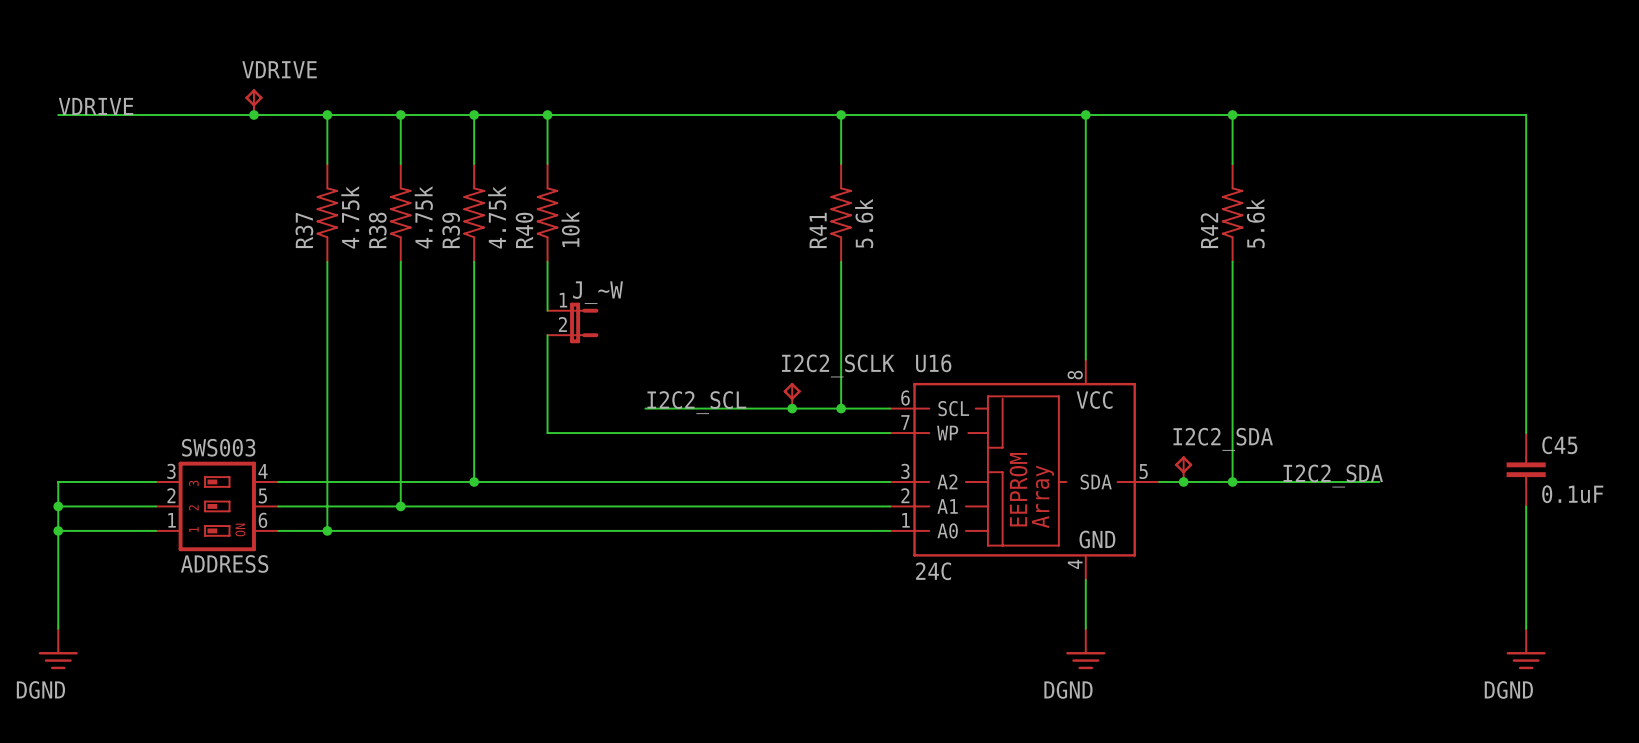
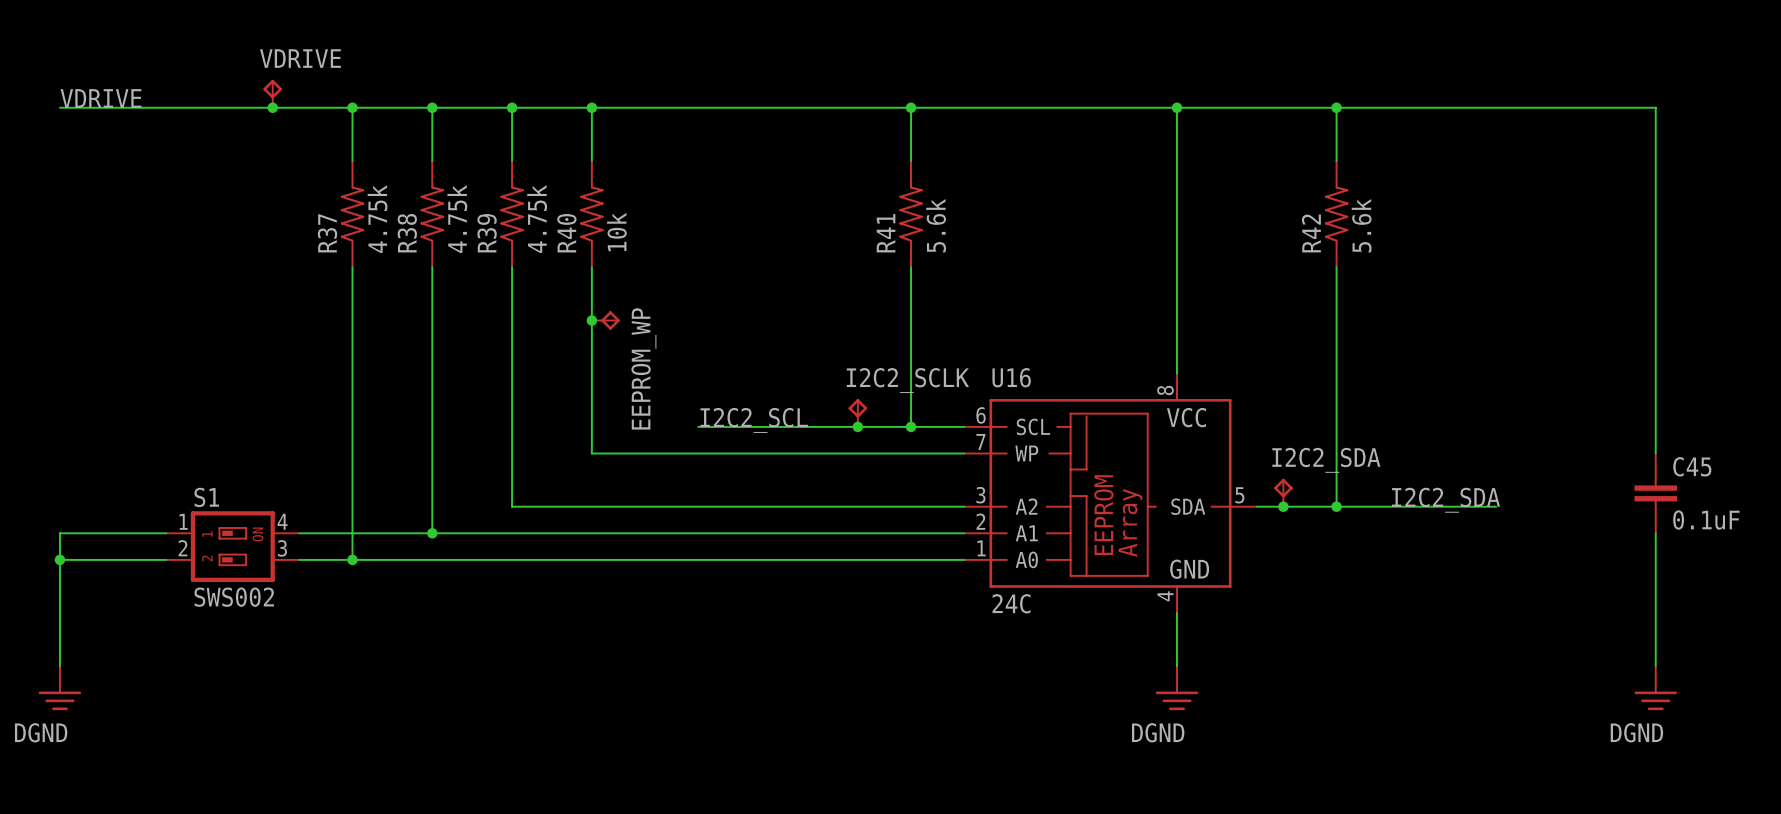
wire: none -> (591, 320) (591, 347)
junction: none -> (591, 320)
EEPROM_WP: none -> (605, 320)
J_~W: (572, 322) -> none
wire: (156, 481) (58, 481) (58, 506) -> none
wire: (278, 481) (474, 481) -> none
junction: (474, 481) -> none
junction: (58, 506) -> none
ADDRESS: SWS003 (217, 506) -> none
S1: none -> SWS002 (232, 546)

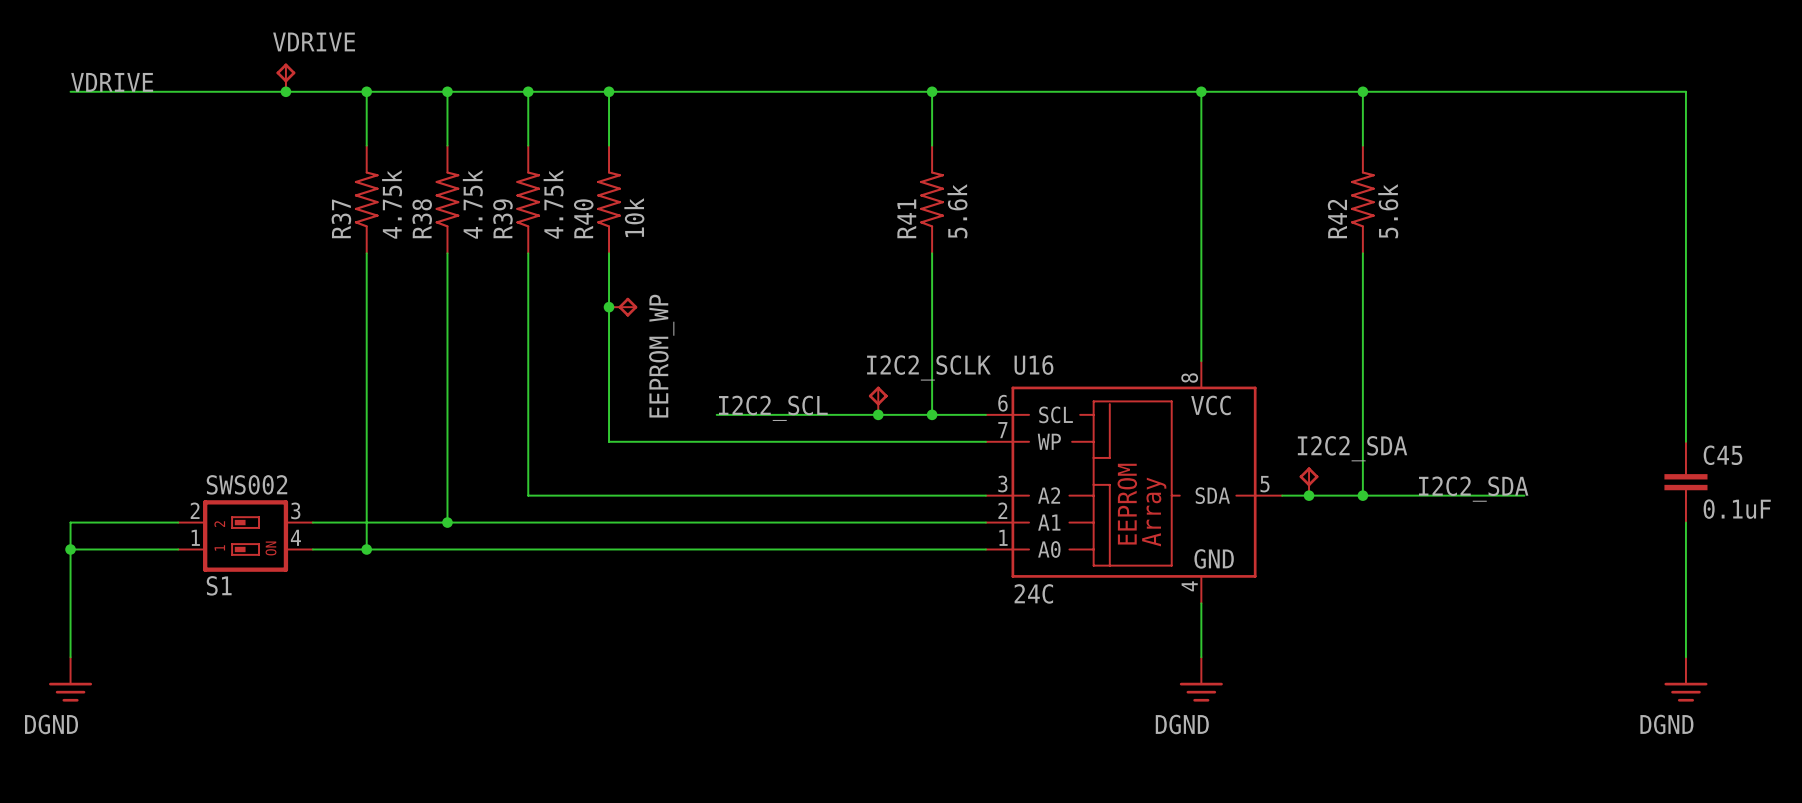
S1 flip: as is (232, 546) -> up-down (245, 536)

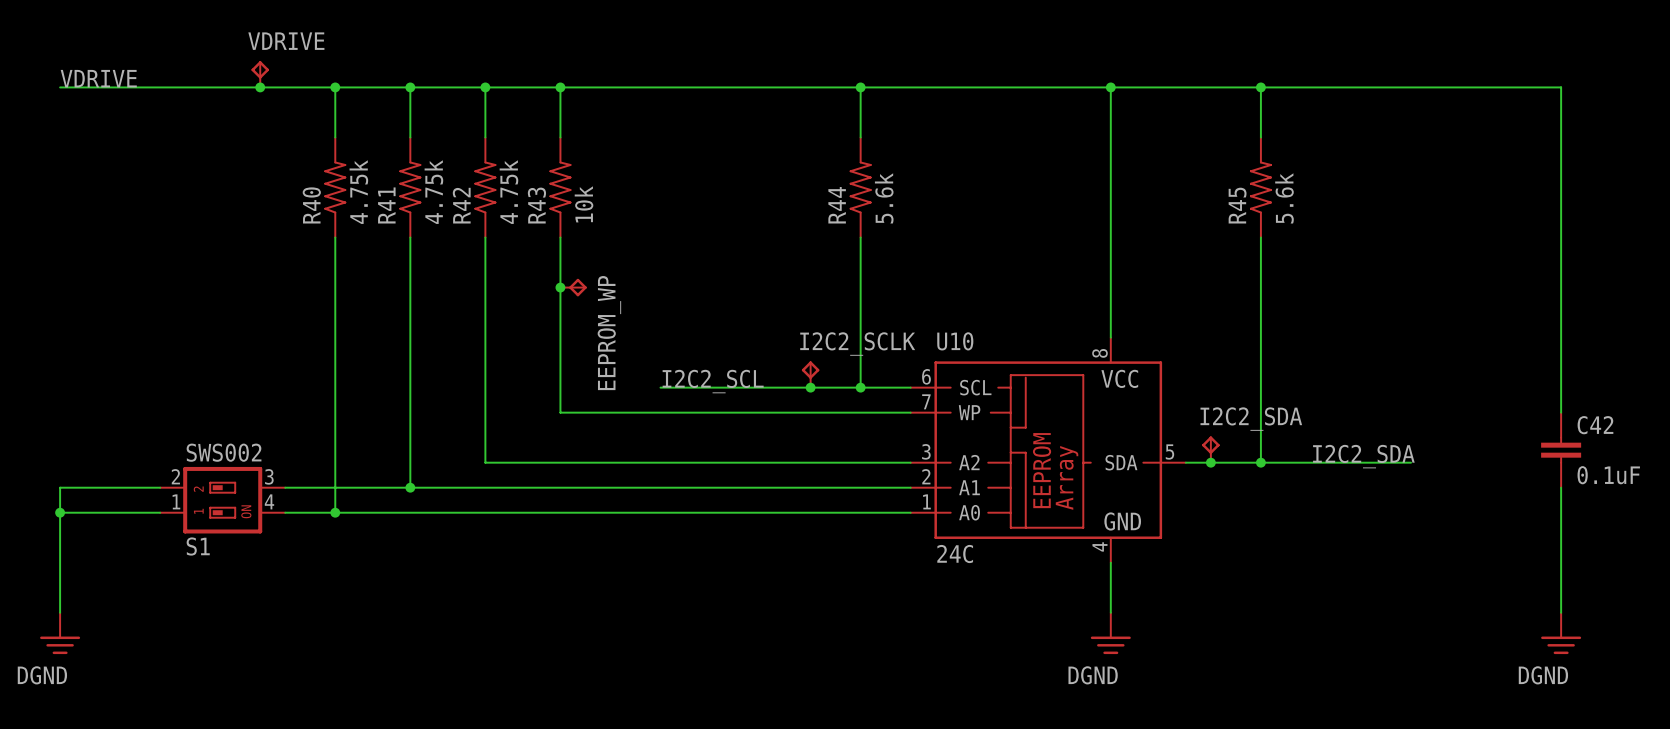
R37 name: R37 (341, 218) -> R40 (311, 205)
R38 name: R38 (422, 218) -> R41 (386, 205)
R39 name: R39 (502, 218) -> R42 (461, 205)
R40 name: R40 (583, 218) -> R43 (536, 205)
R41 name: R41 (906, 218) -> R44 (837, 205)
R42 name: R42 (1337, 219) -> R45 (1237, 205)
U16 name: U16 (1033, 365) -> U10 (955, 341)
C45 name: C45 (1722, 455) -> C42 (1595, 425)

